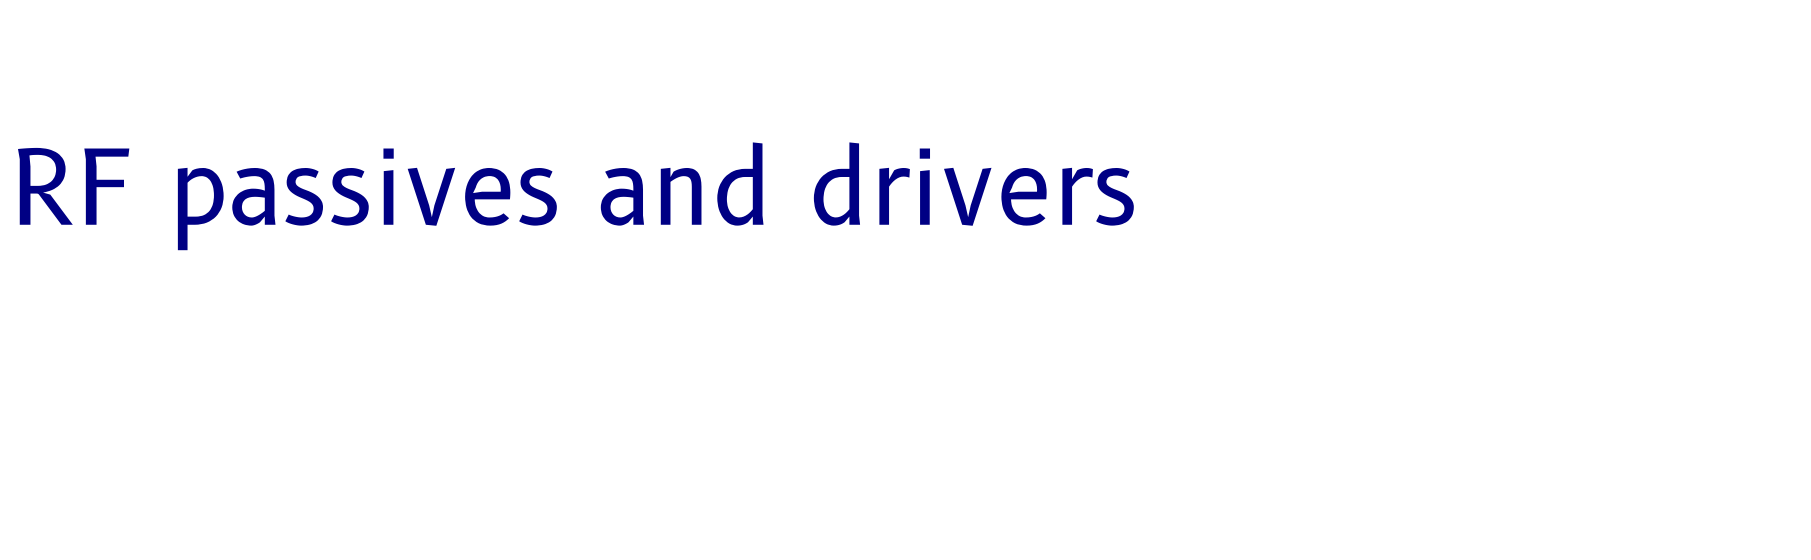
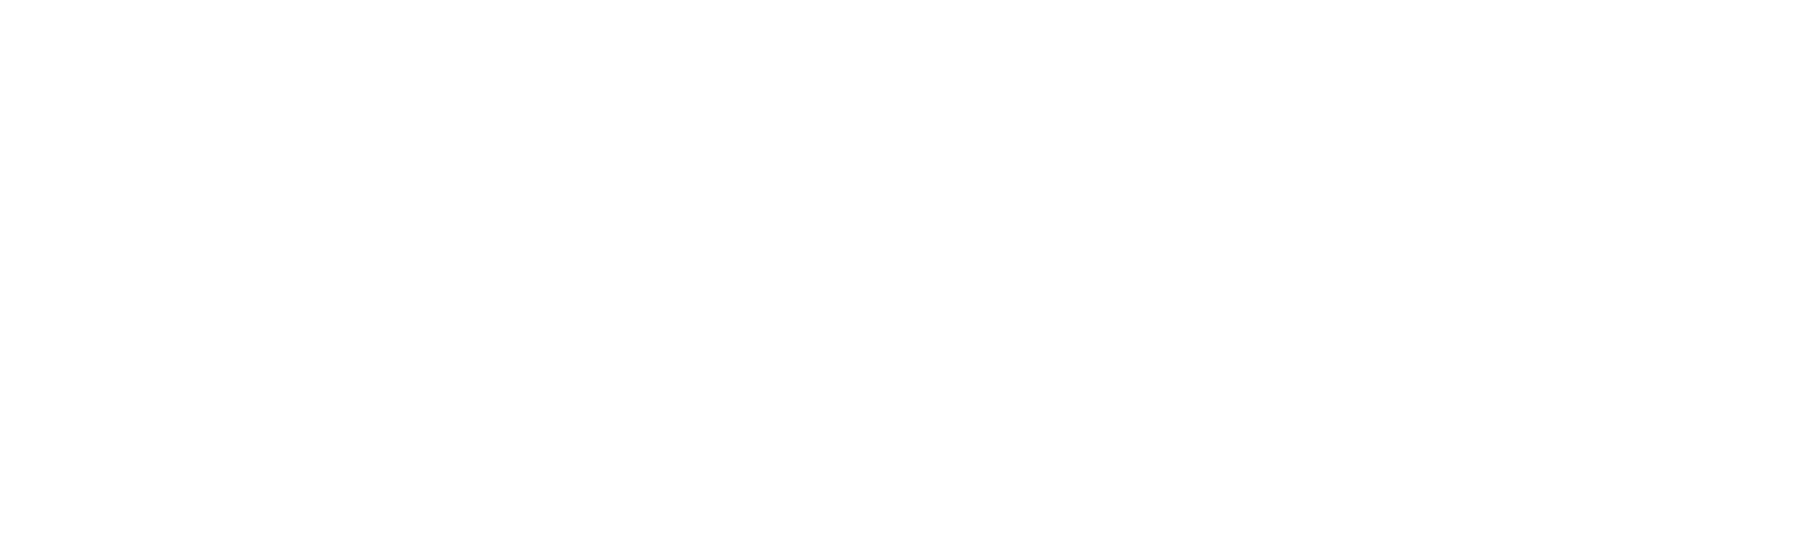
text: RF passives and drivers (575, 196) -> none

